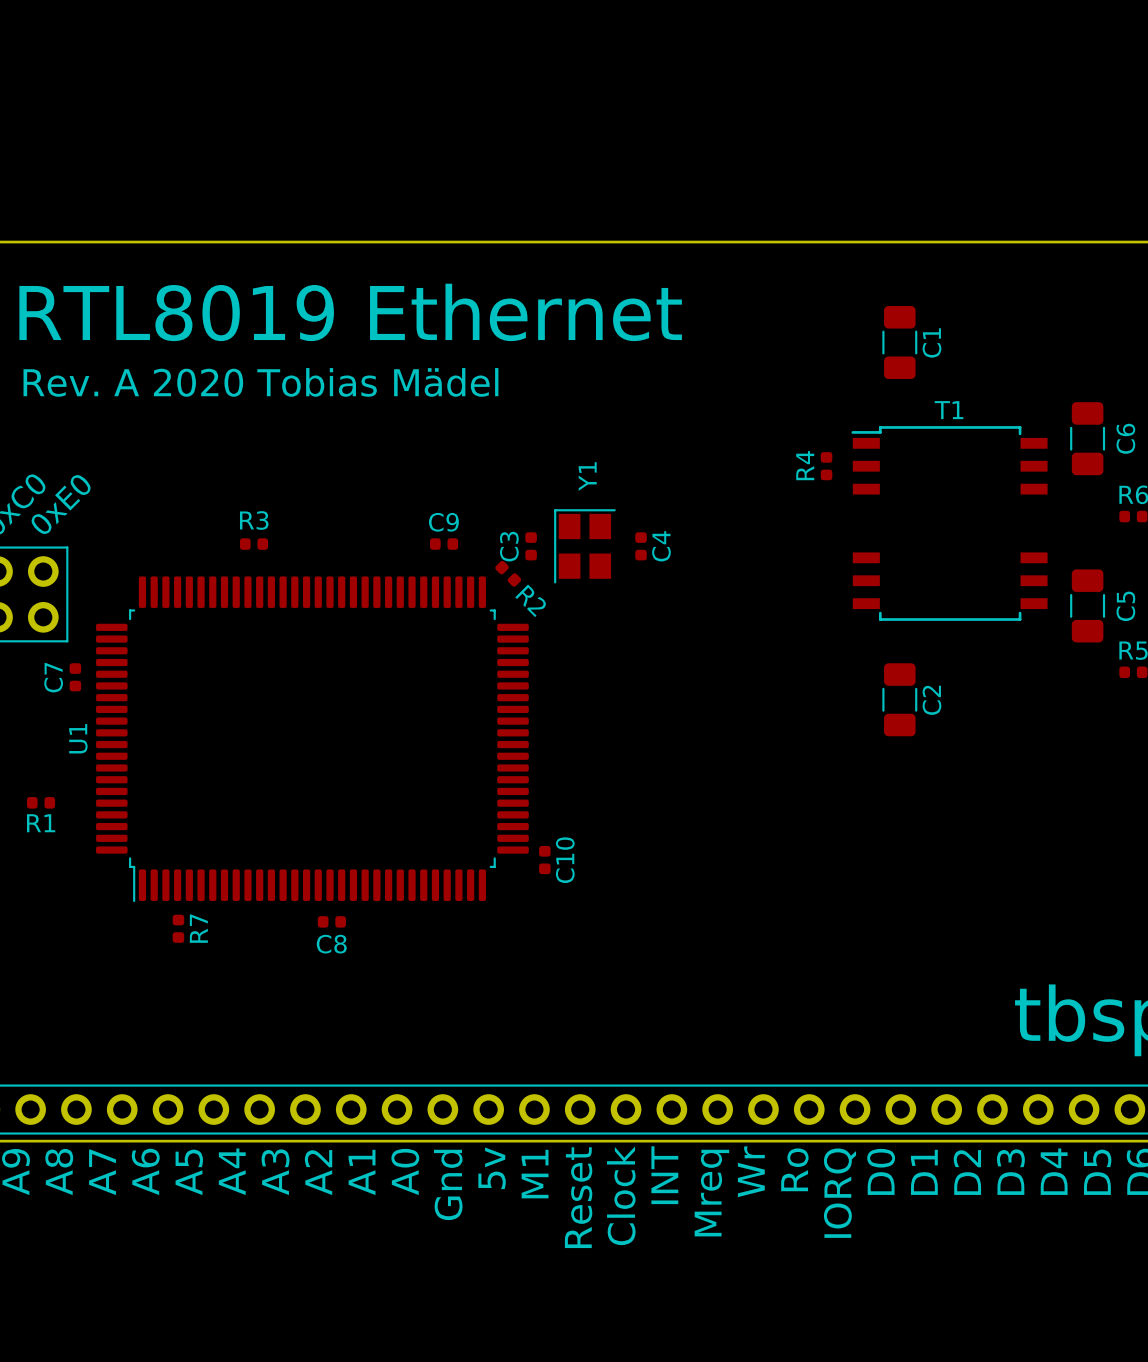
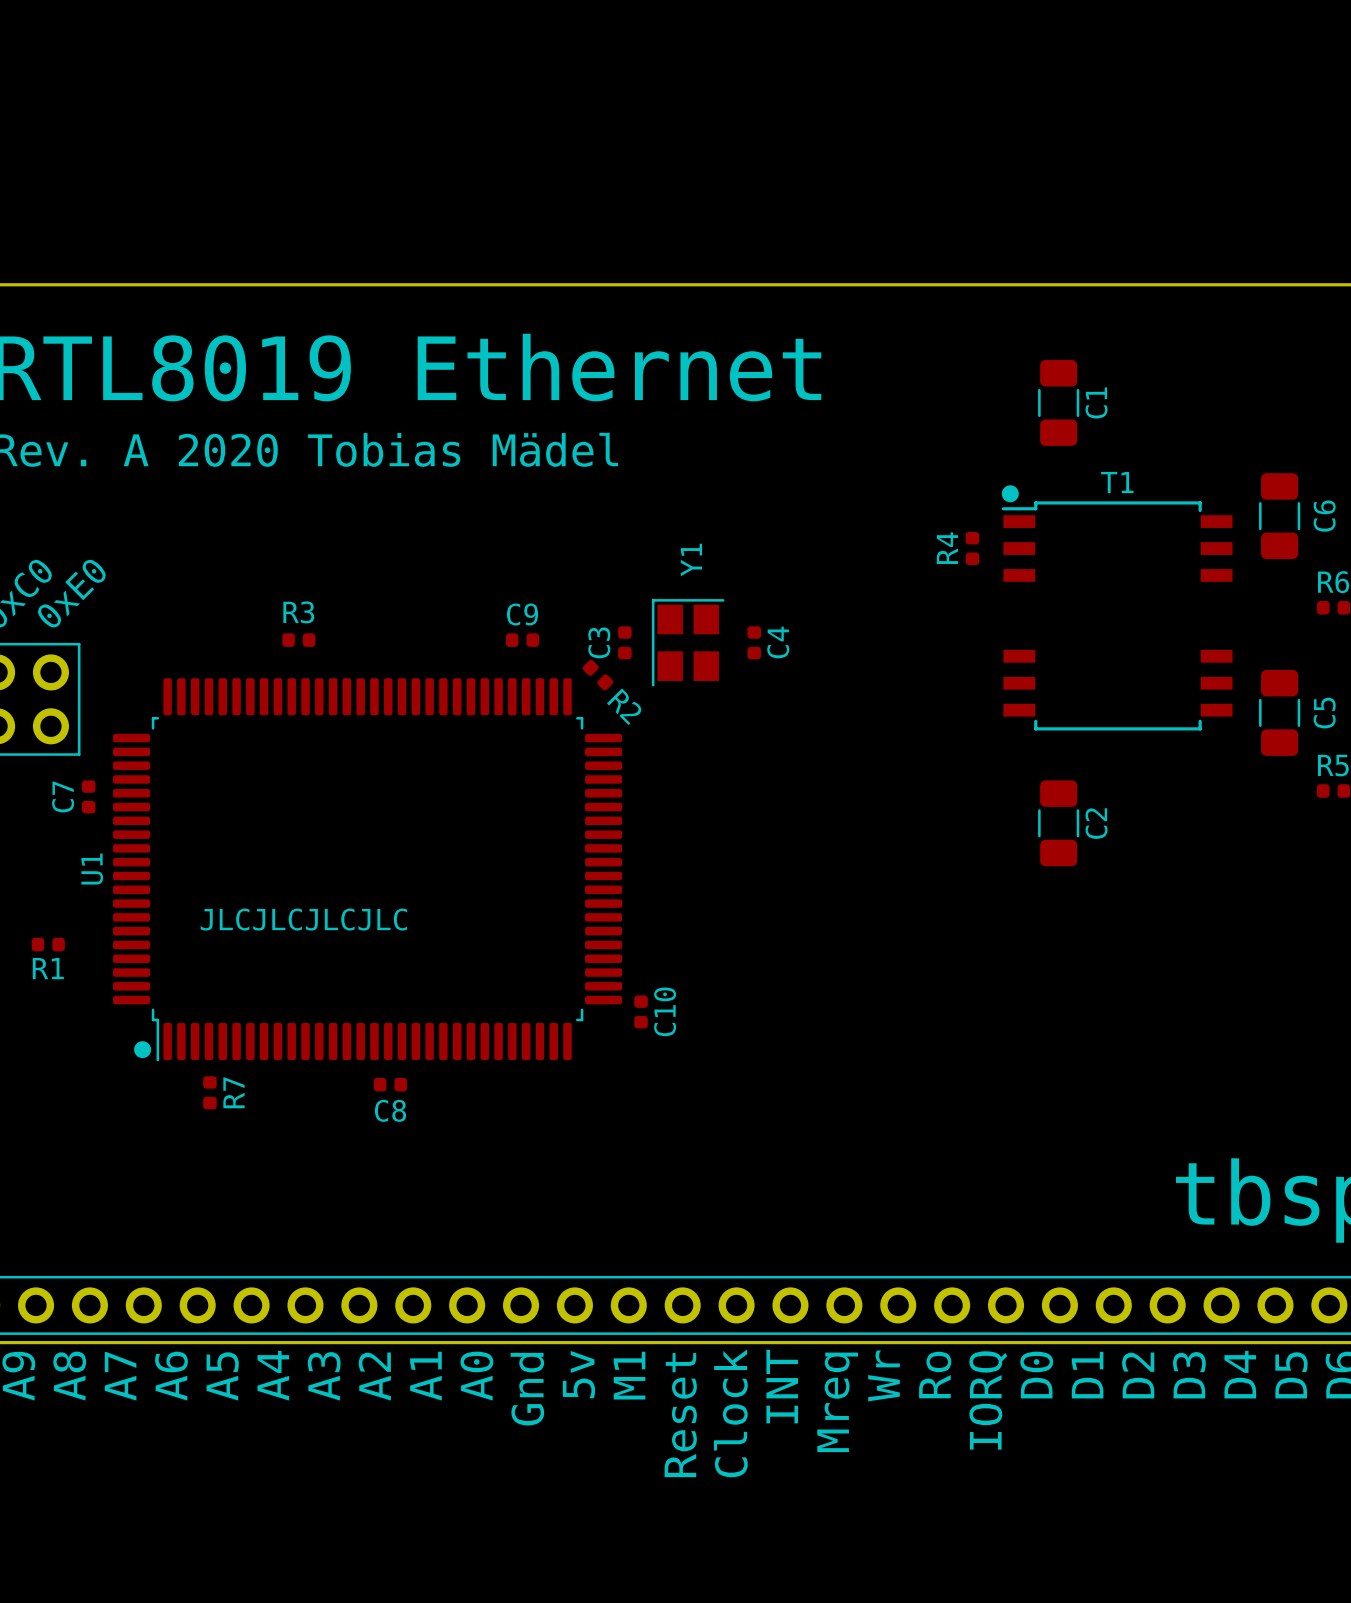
drawing: none -> [1001, 485, 1019, 503]
text: none -> JLCJLCJLCJLC (303, 919)
drawing: none -> [134, 1041, 152, 1059]

